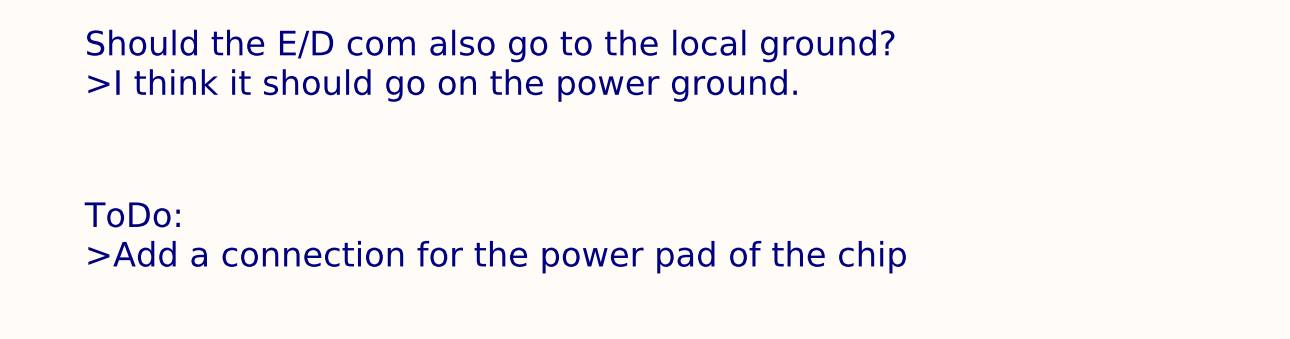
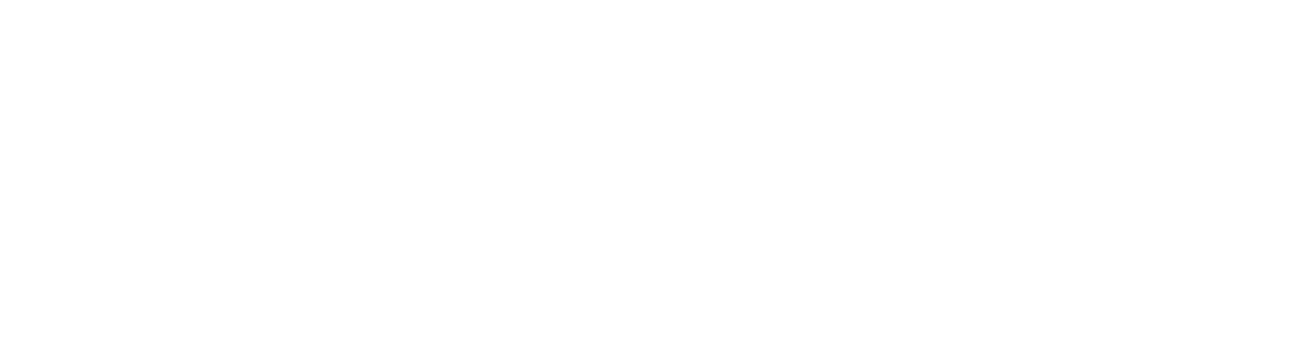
text: Should the E/D com also go to the local ground? (490, 46) -> none
text: >I think it should go on the power ground. (442, 85) -> none
text: ToDo: (132, 214) -> none
text: >Add a connection for the power pad of the chip (497, 257) -> none

